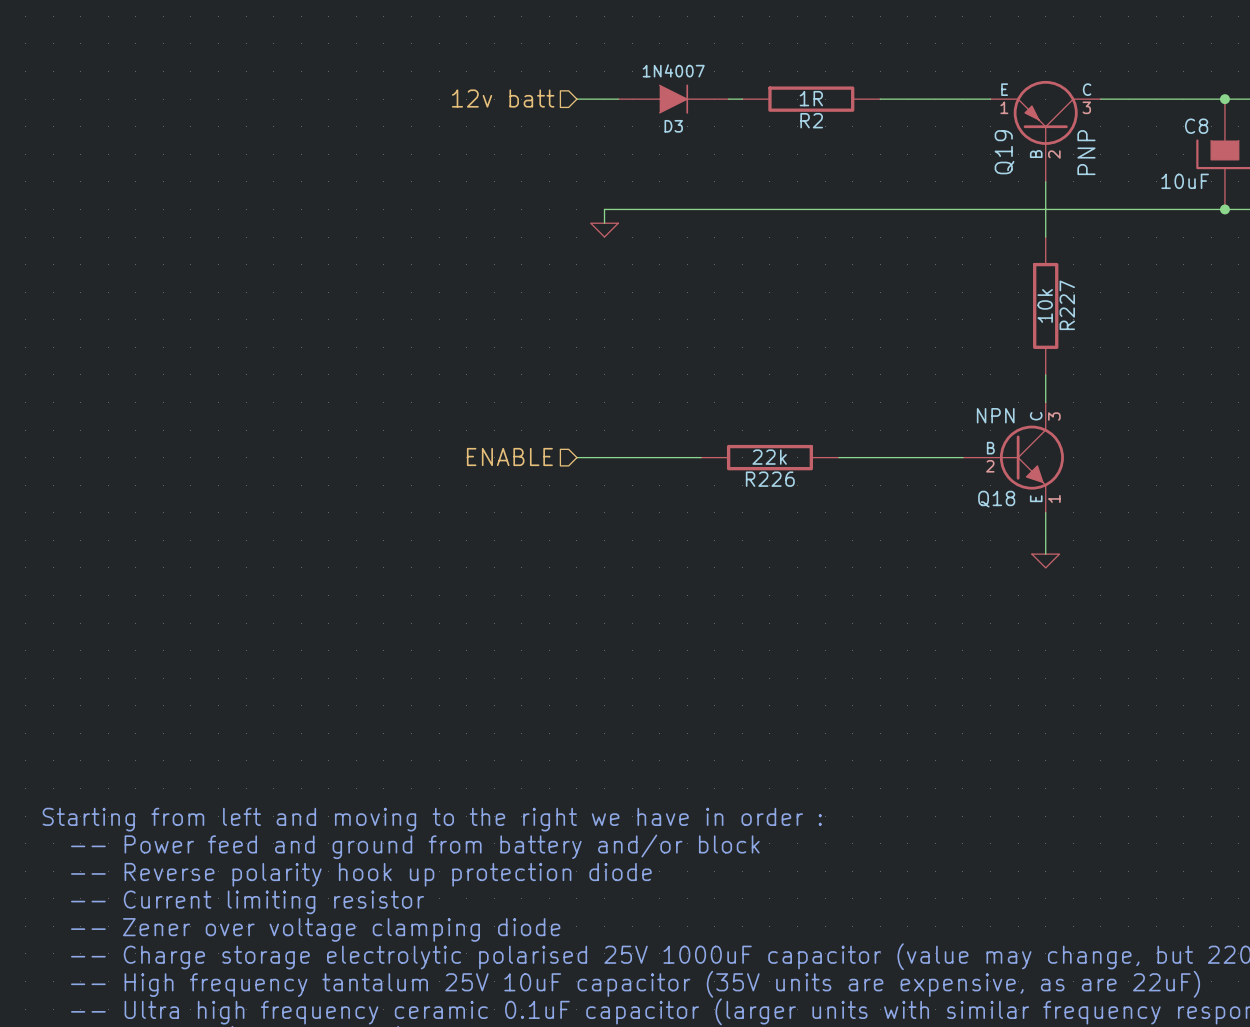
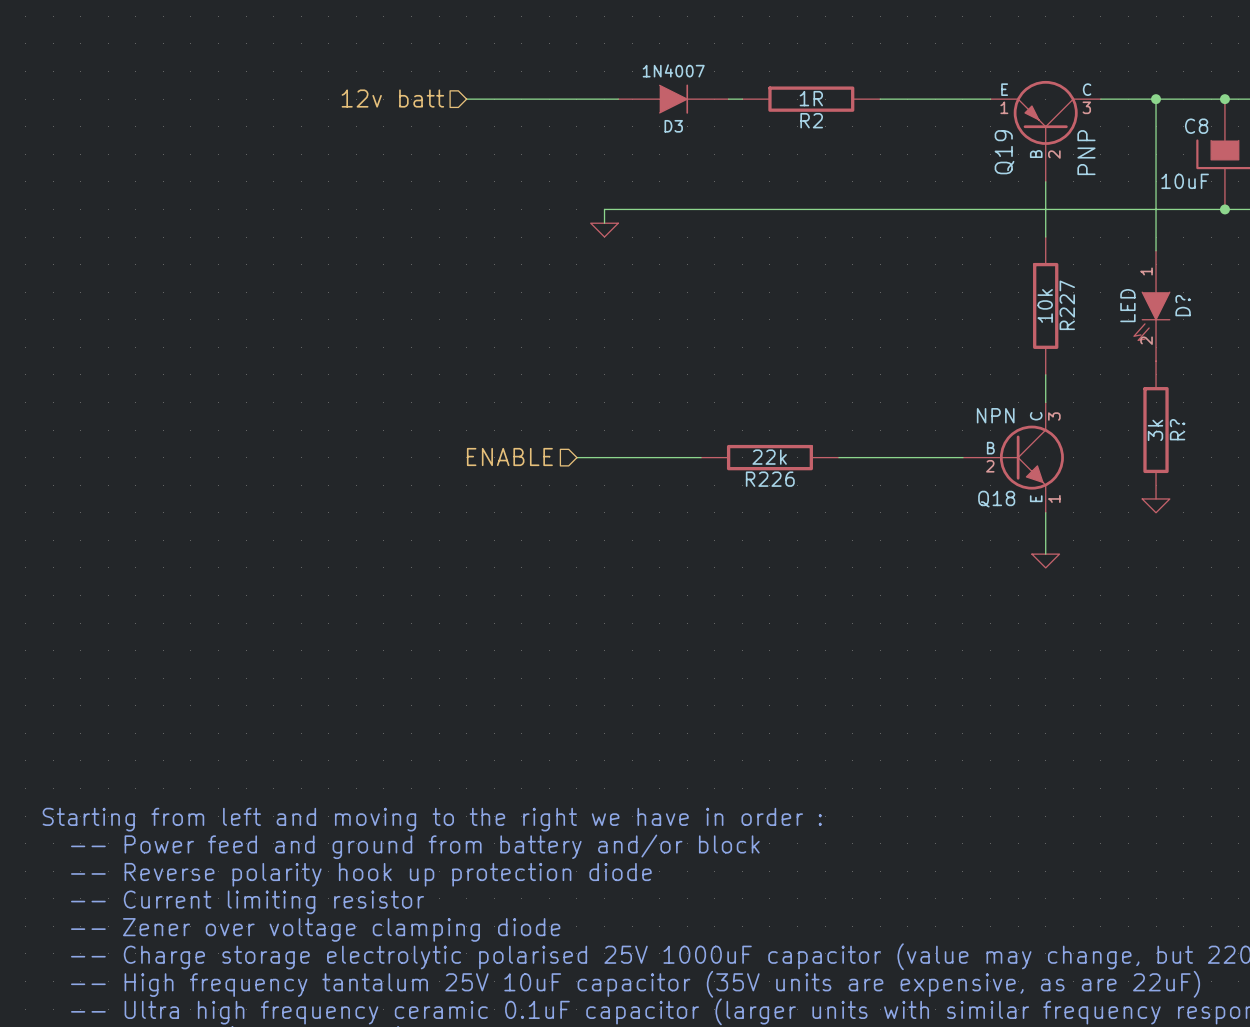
hierarchical label position: 12v batt (503, 98) -> 12v batt (392, 98)
wire: none -> (466, 99) (576, 99)
wire: none -> (1156, 99) (1156, 250)
junction: none -> (1156, 99)
D?: none -> LED (1151, 305)
R?: none -> 3k (1156, 430)
power symbol: none -> (1156, 505)

